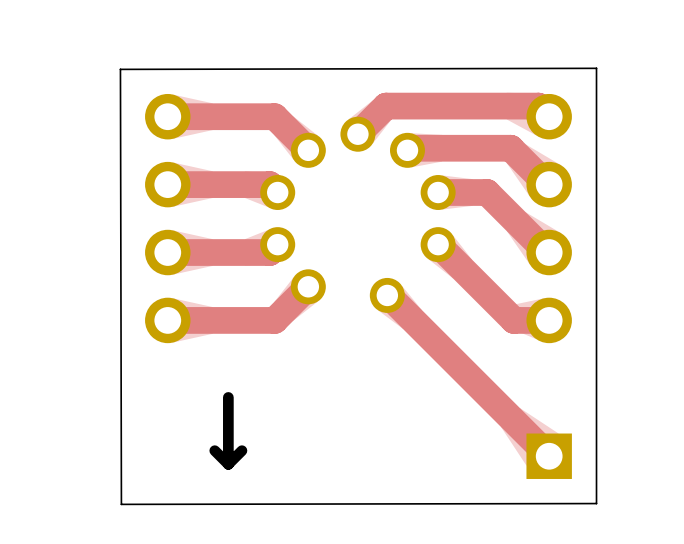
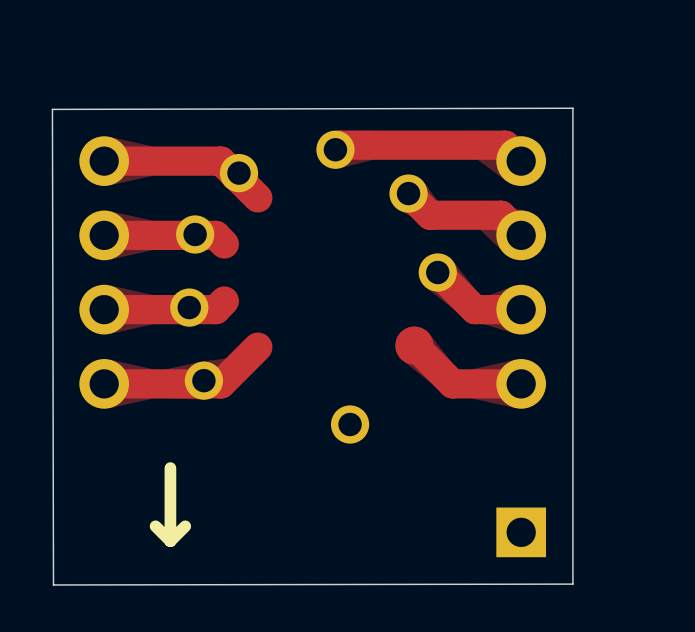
track: (538, 106) (386, 106) (357, 134) -> (509, 149) (505, 145) (339, 145) (335, 149)
part footprint: [260, 116, 456, 313] -> [170, 130, 457, 444]
track: none -> (408, 193) (430, 215) (501, 215) (521, 235)
track: (407, 150) (409, 148) (510, 148) (547, 184) -> none
track: (438, 192) (487, 192) (547, 252) -> (437, 272) (474, 309) (518, 309)
track: (438, 244) (513, 320) -> (414, 345) (452, 383) (482, 383)
track: (387, 295) (549, 456) -> none

